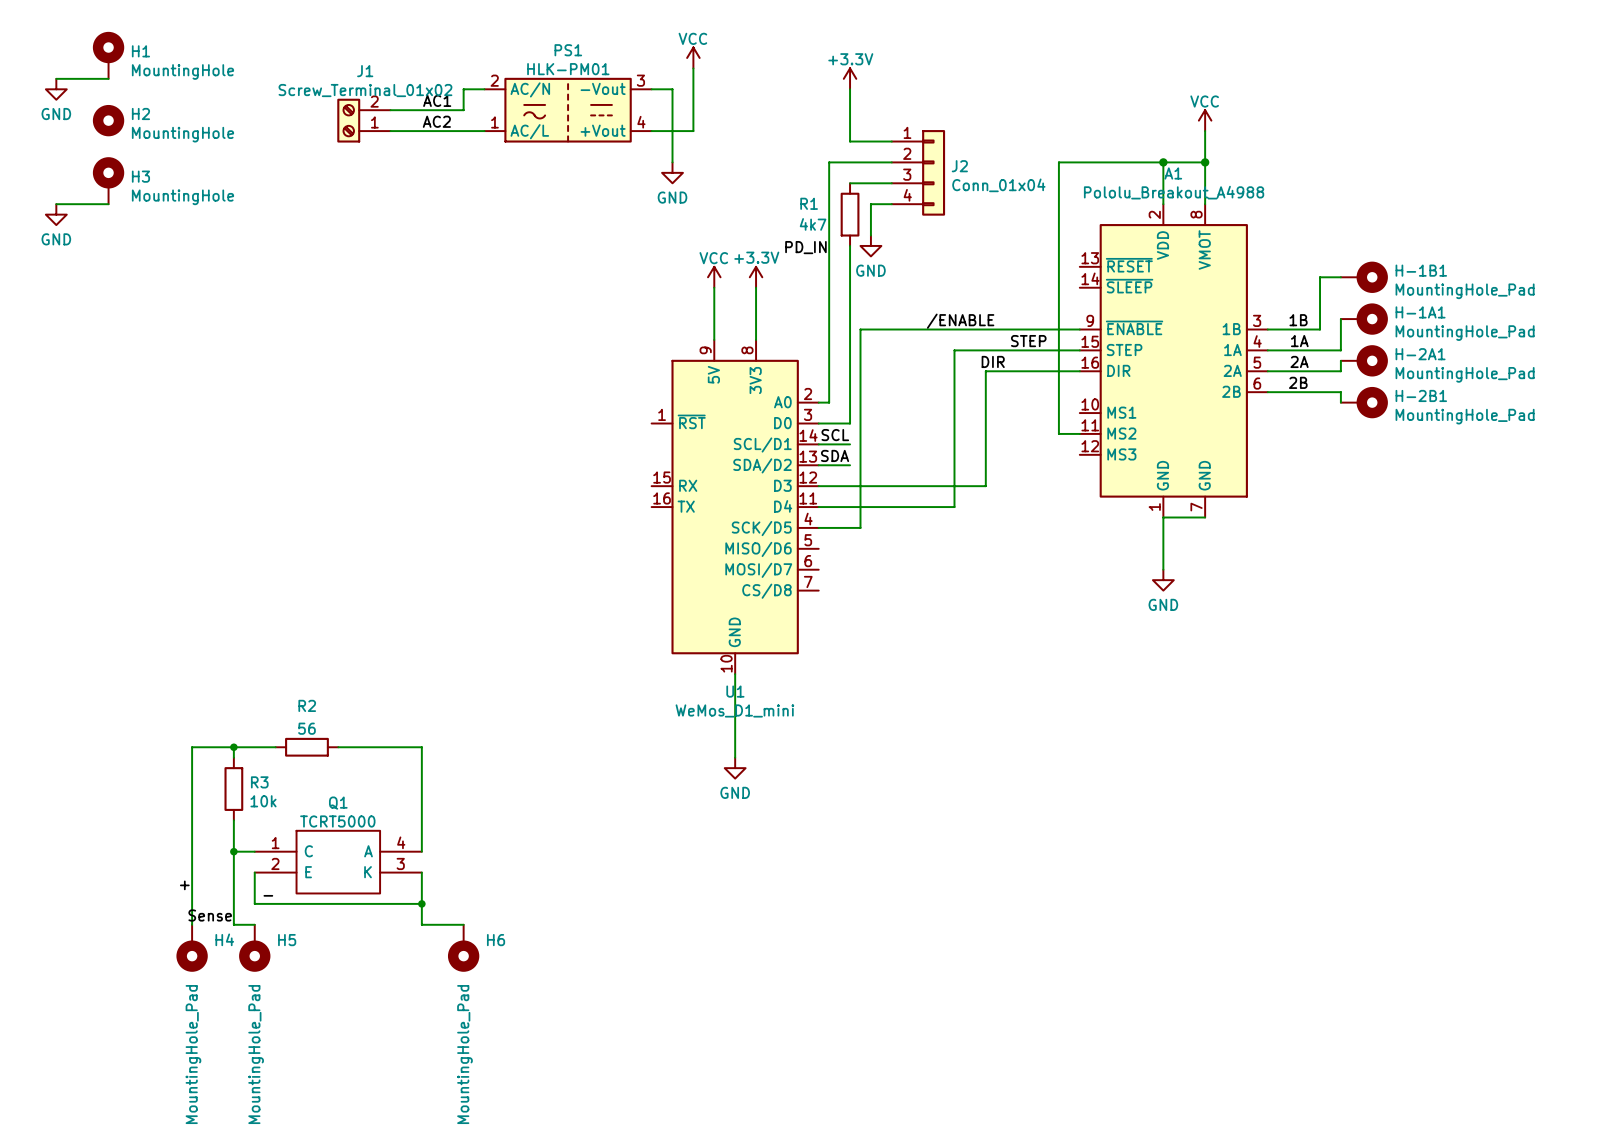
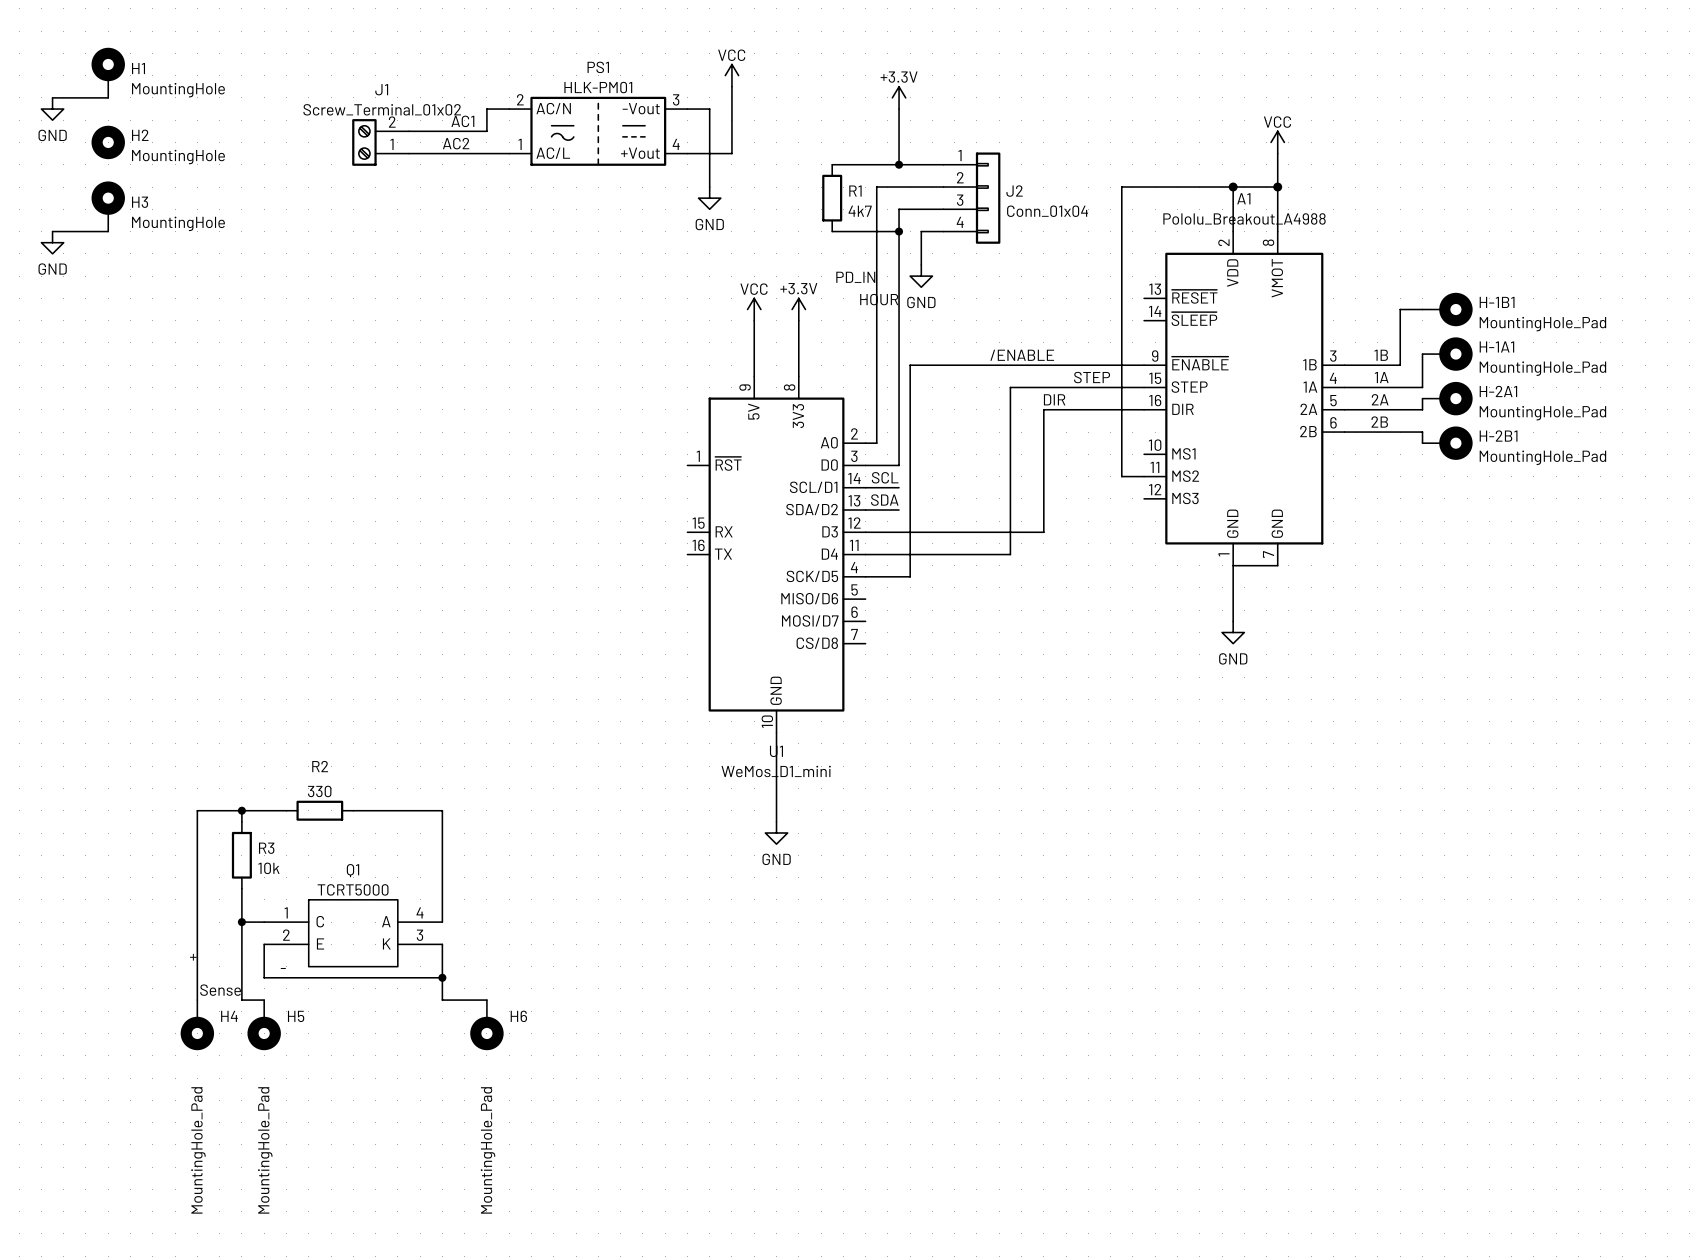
wire: none -> (832, 164) (899, 164)
junction: none -> (899, 164)
wire: none -> (899, 209) (899, 276)
R1 name position: R1 (809, 203) -> R1 (855, 191)
wire: none -> (832, 231) (899, 231)
junction: none -> (899, 231)
R1 position: (850, 214) -> (832, 198)
R1 value position: 4k7 (813, 224) -> 4k7 (860, 211)
label: none -> HOUR (879, 299)
R2 value: 56 (306, 728) -> 330 (319, 791)

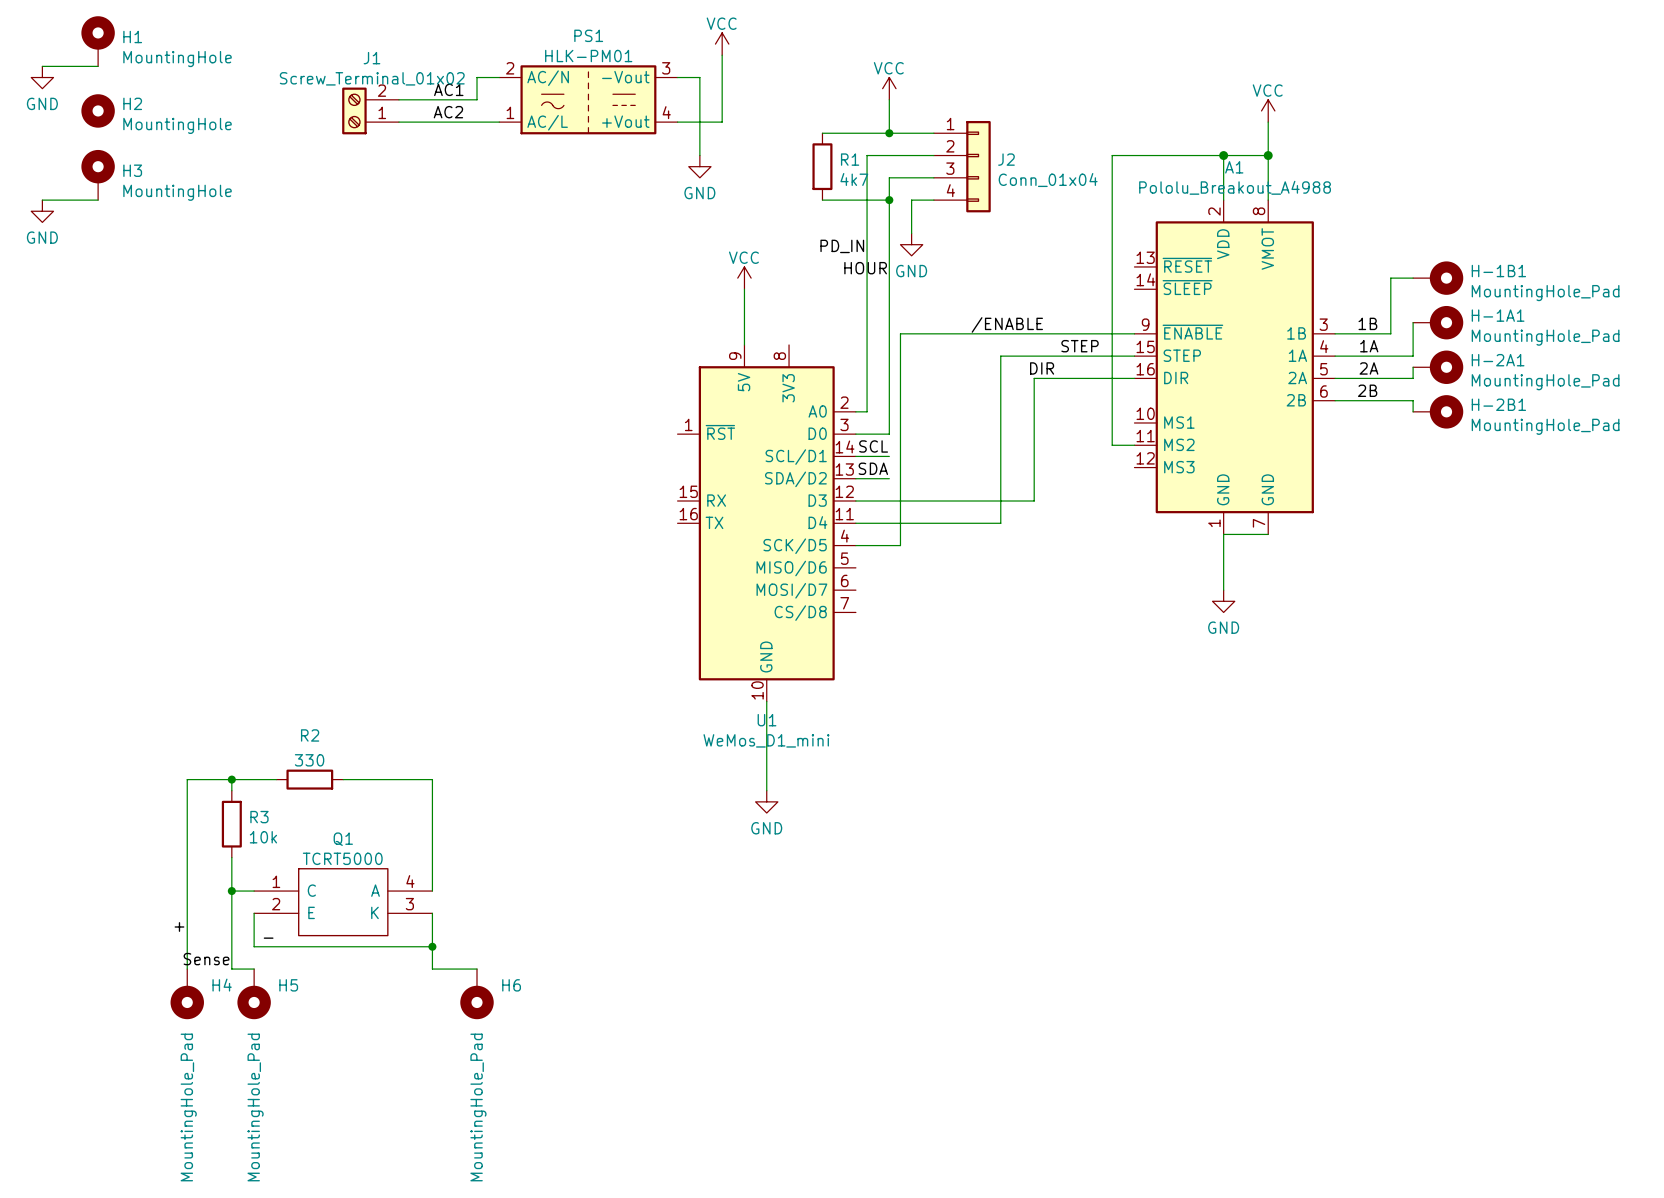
power symbol: +3.3V (899, 97) -> none
power symbol: none -> VCC (889, 88)
power symbol: +3.3V (798, 309) -> none
wire: (798, 320) (798, 376) -> none

